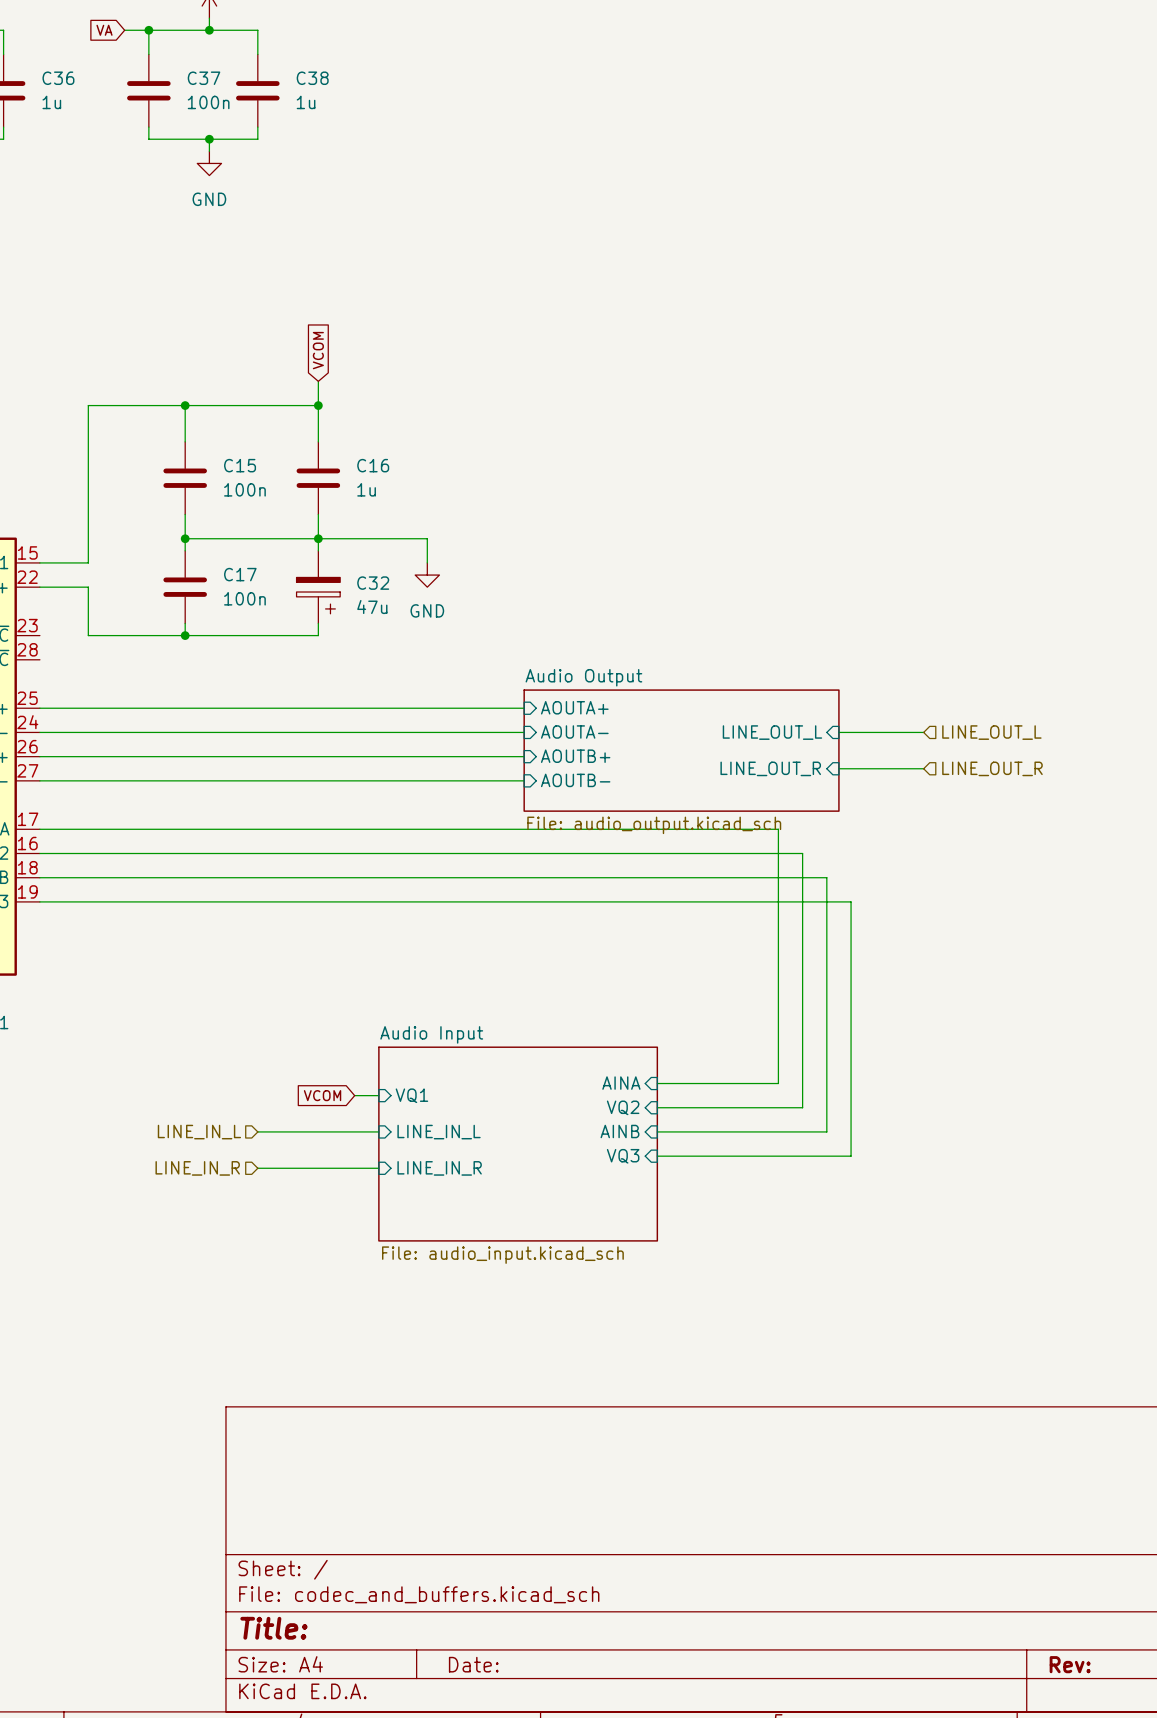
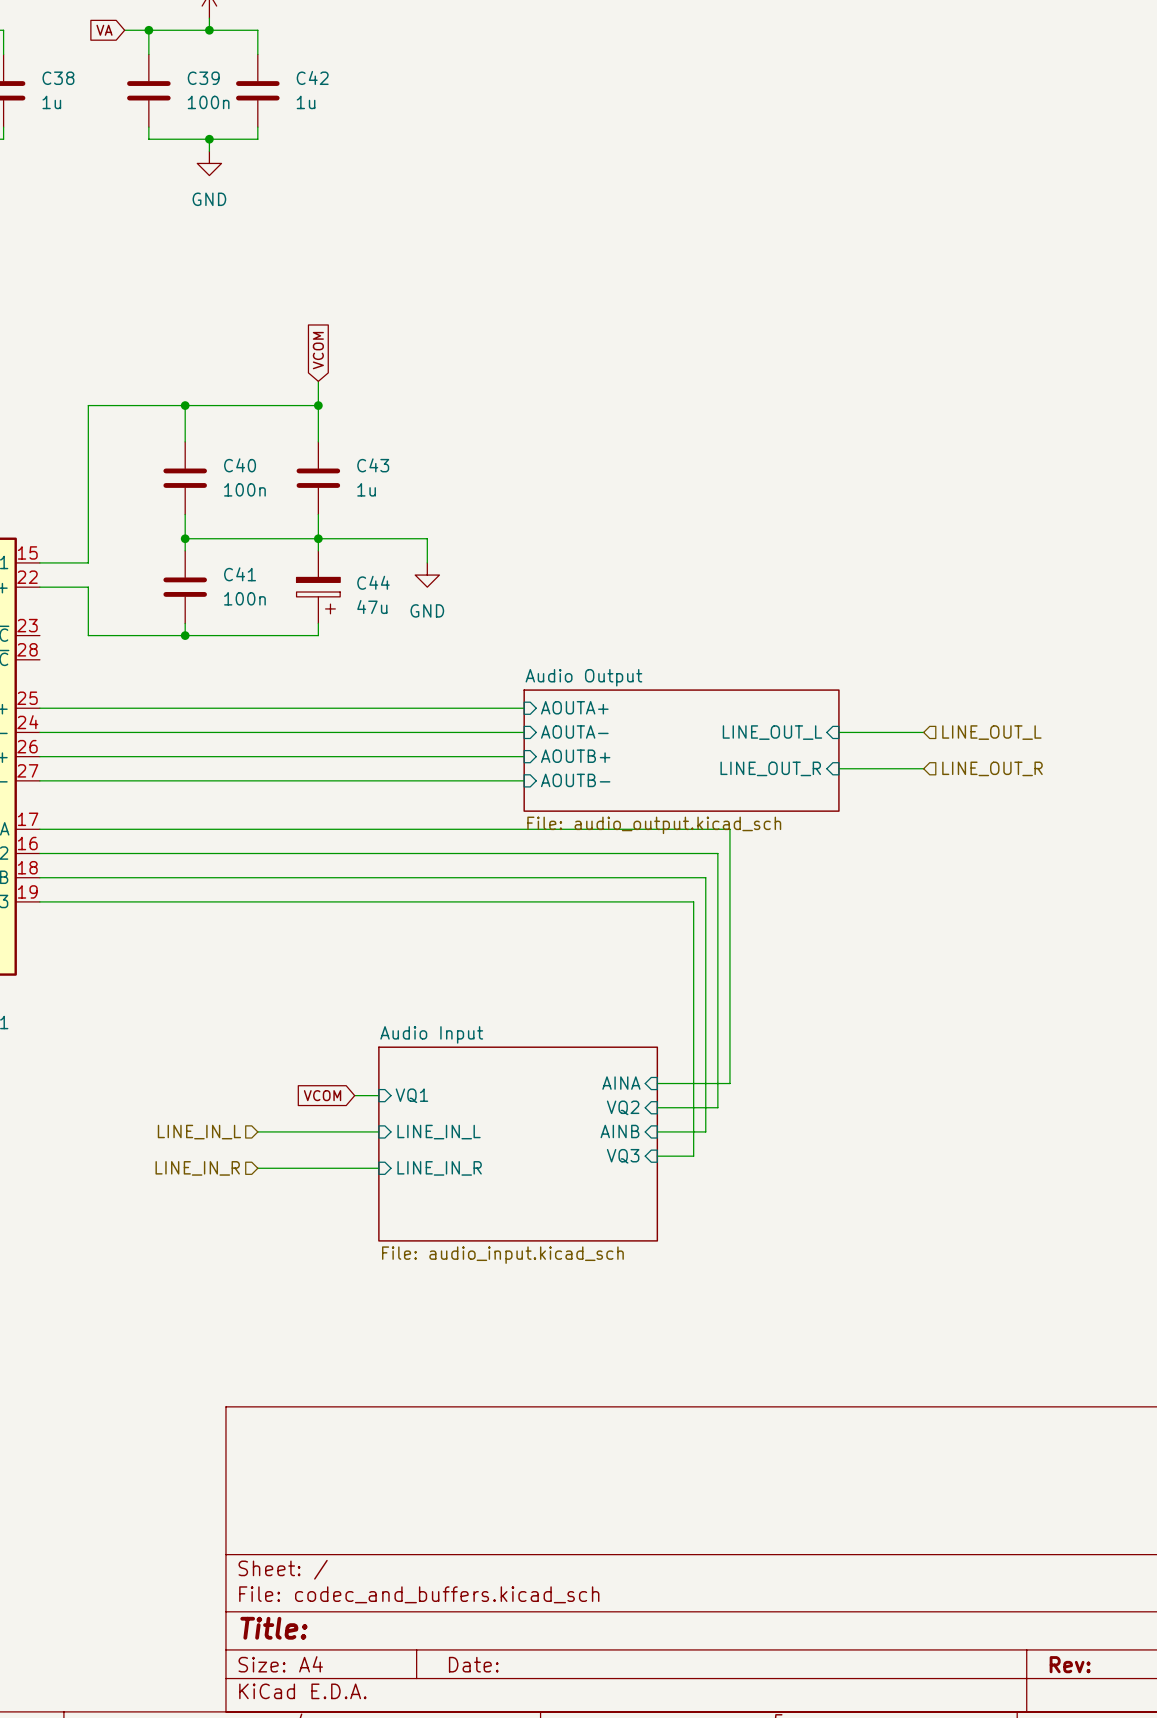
C36 name: C36 (58, 78) -> C38 (58, 78)
C37 name: C37 (204, 78) -> C39 (203, 78)
C38 name: C38 (312, 78) -> C42 (312, 77)
C15 name: C15 (240, 465) -> C40 (240, 465)
C16 name: C16 (373, 465) -> C43 (373, 465)
C17 name: C17 (240, 574) -> C41 (240, 574)
C32 name: C32 (373, 583) -> C44 (373, 582)
wire: (729, 829) (778, 829) (778, 1083) (729, 1083) -> (729, 829) (729, 1083)
wire: (717, 853) (802, 853) (802, 1107) (717, 1107) -> (717, 853) (717, 1107)
wire: (705, 877) (826, 877) (826, 1131) (705, 1131) -> (705, 877) (705, 1131)
wire: (693, 901) (851, 901) (851, 1156) (693, 1156) -> (693, 901) (693, 1156)

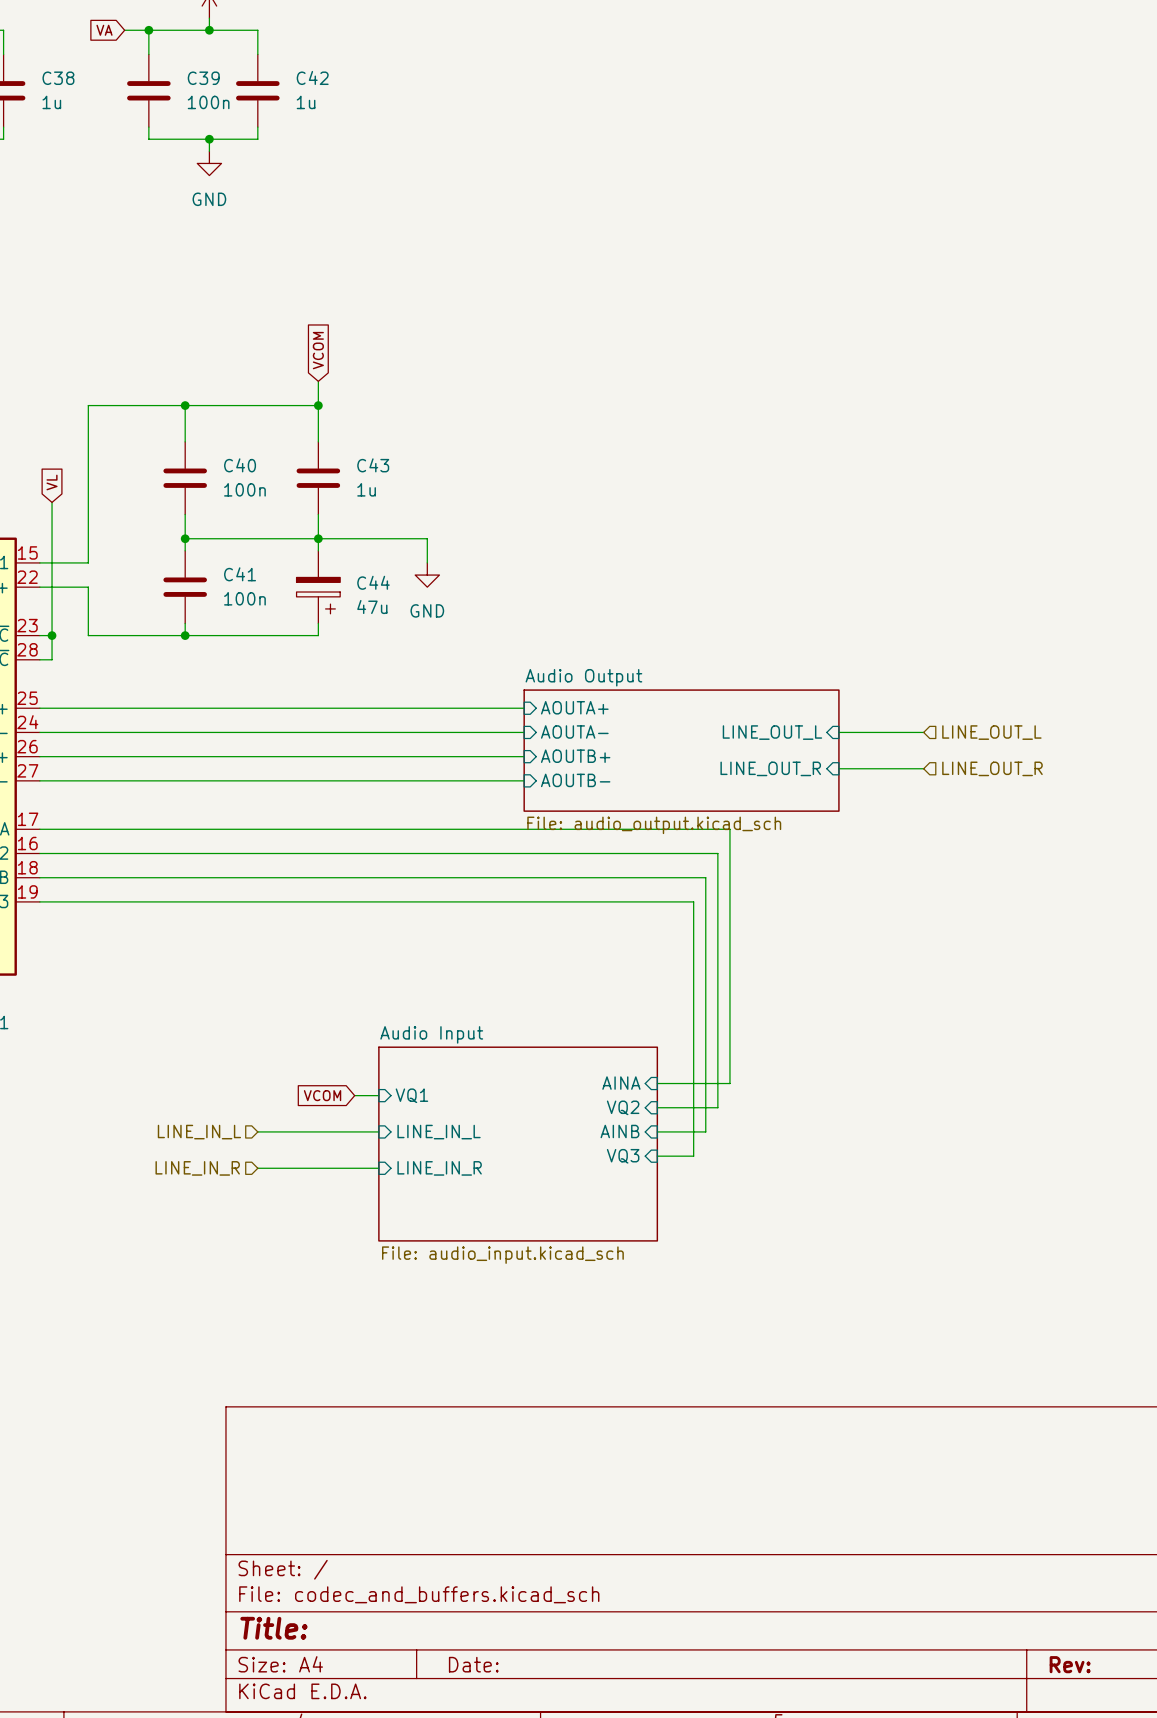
global label: none -> VL (52, 482)
wire: none -> (52, 502) (52, 659) (39, 659)
wire: none -> (39, 635) (52, 635)
junction: none -> (52, 635)

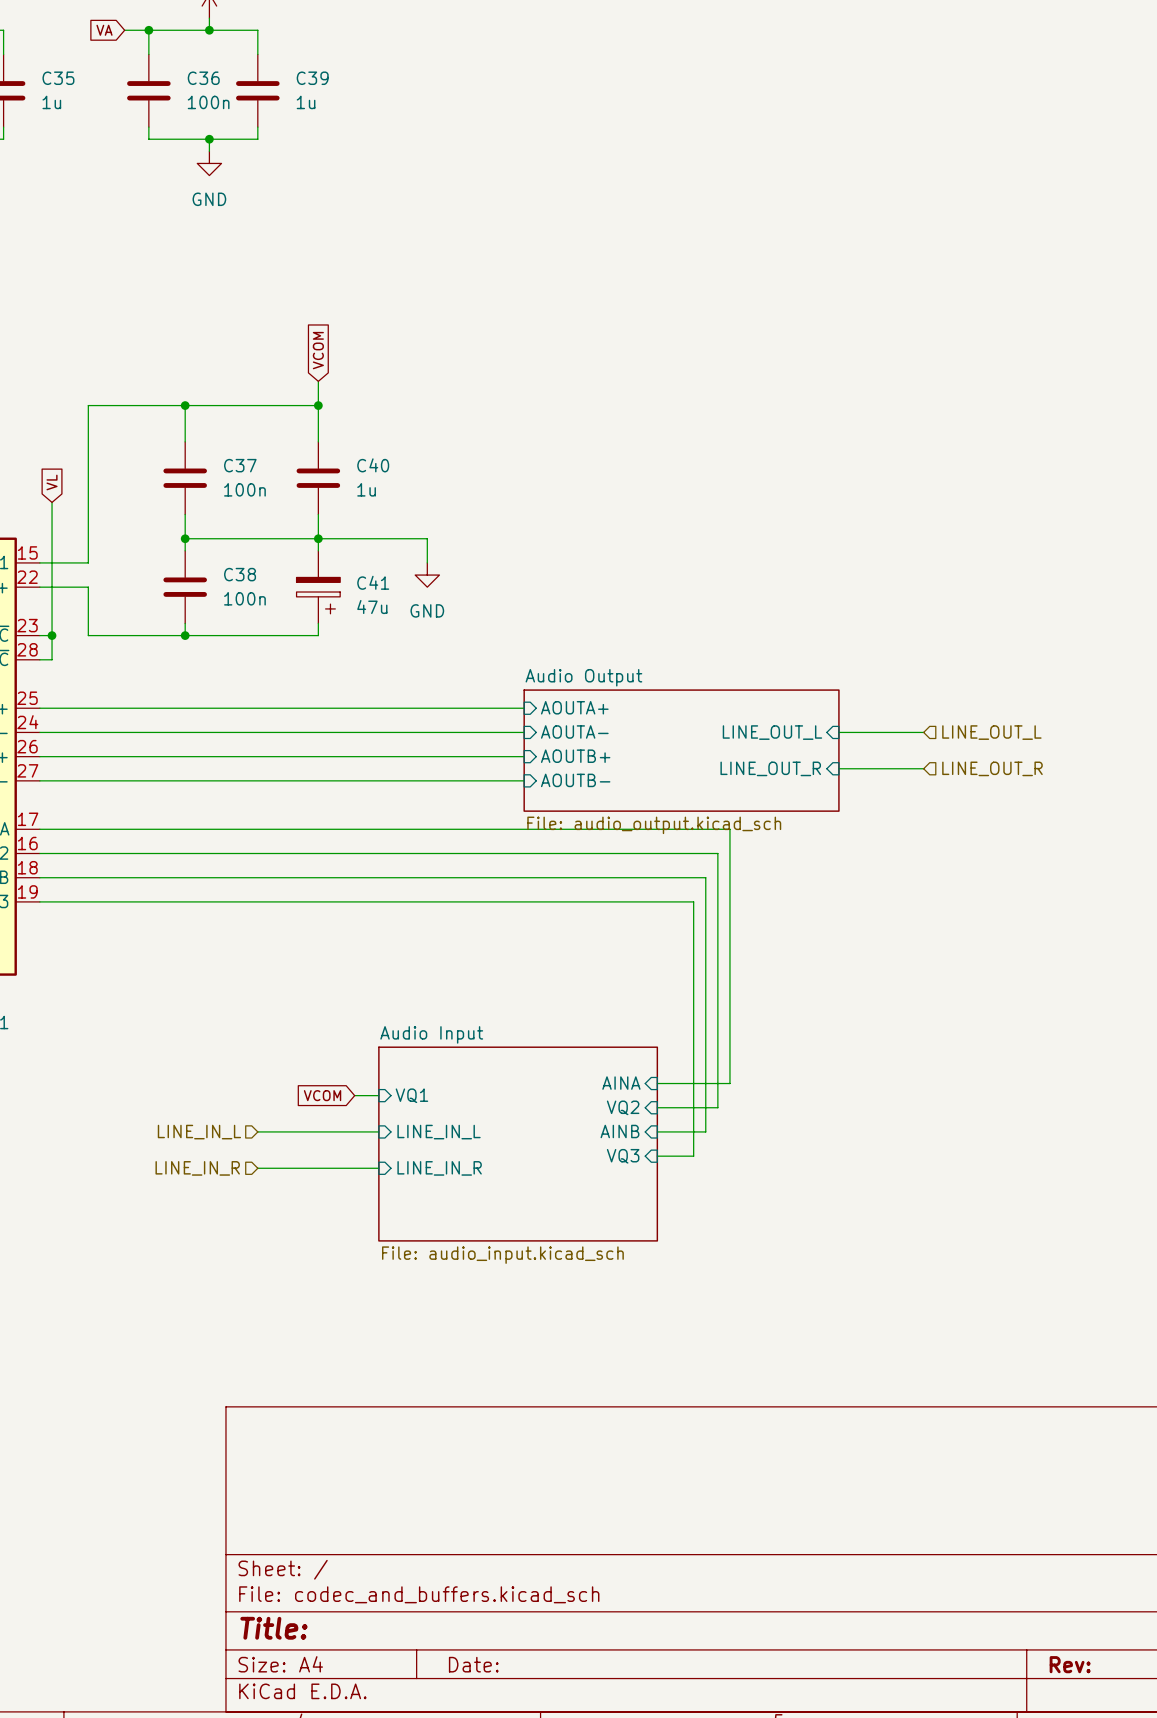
C42 name: C42 (312, 77) -> C39 (312, 78)
C38 name: C38 (58, 78) -> C35 (58, 78)
C39 name: C39 (203, 78) -> C36 (203, 78)
C40 name: C40 (240, 465) -> C37 (240, 465)
C43 name: C43 (373, 465) -> C40 (373, 465)
C41 name: C41 (240, 574) -> C38 (240, 574)
C44 name: C44 (373, 582) -> C41 (373, 582)

